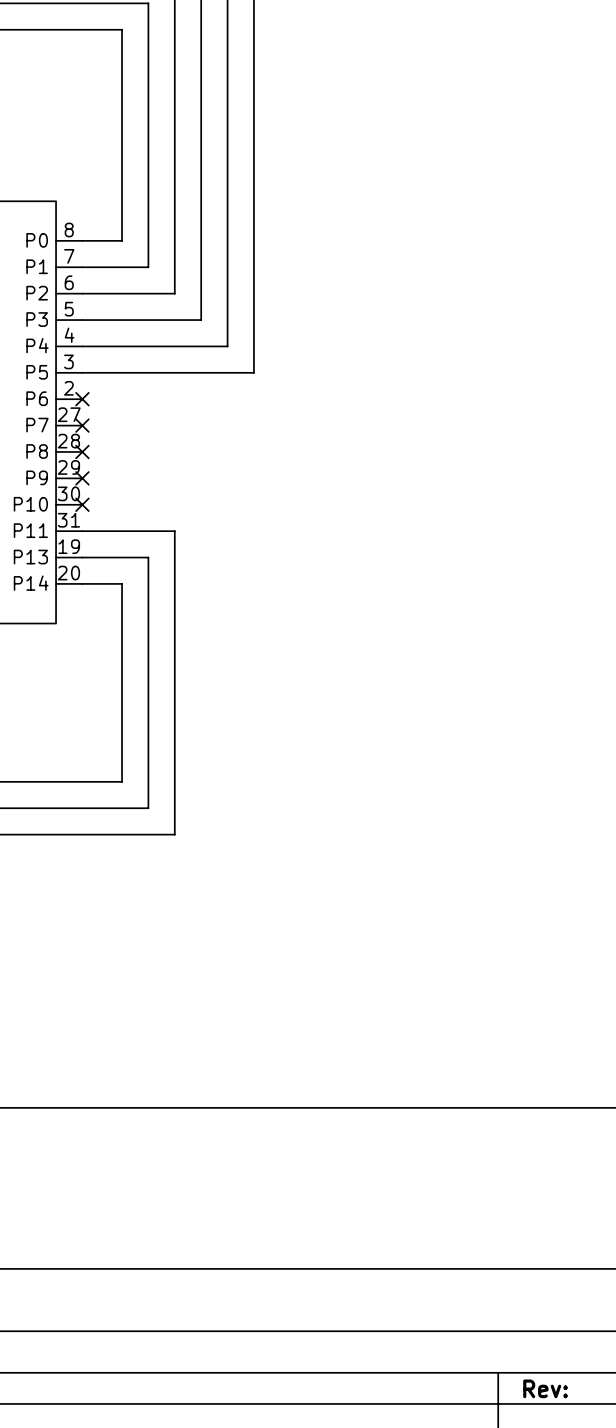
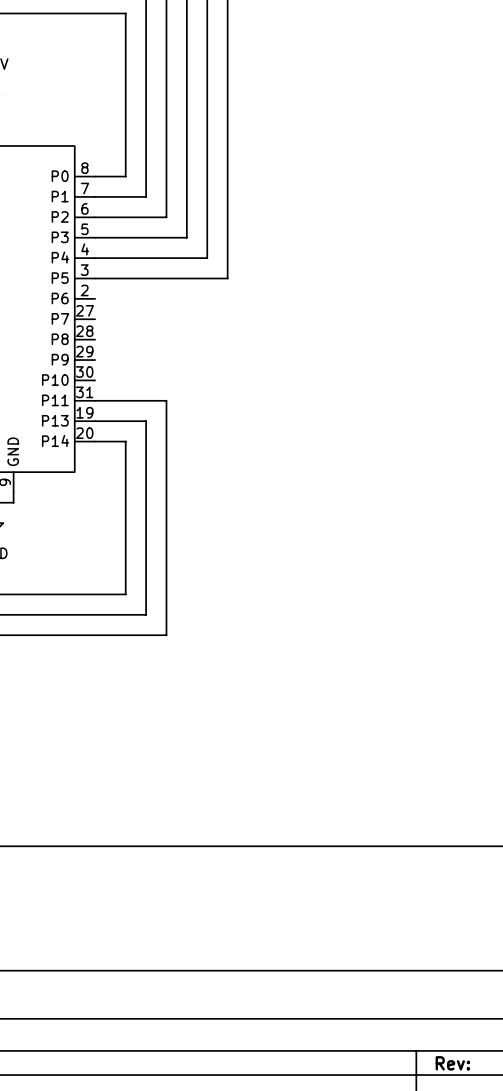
no-connect mark: (82, 399) -> none
no-connect mark: (82, 425) -> none
no-connect mark: (82, 451) -> none
no-connect mark: (82, 478) -> none
no-connect mark: (82, 504) -> none

